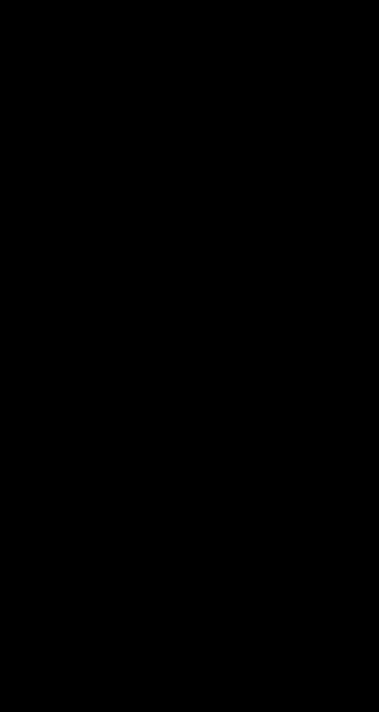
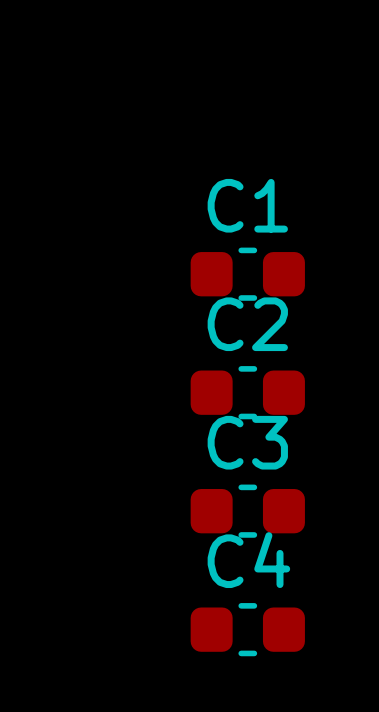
C1: none -> (247, 274)
C2: none -> (247, 392)
C3: none -> (247, 511)
C4: none -> (247, 629)

